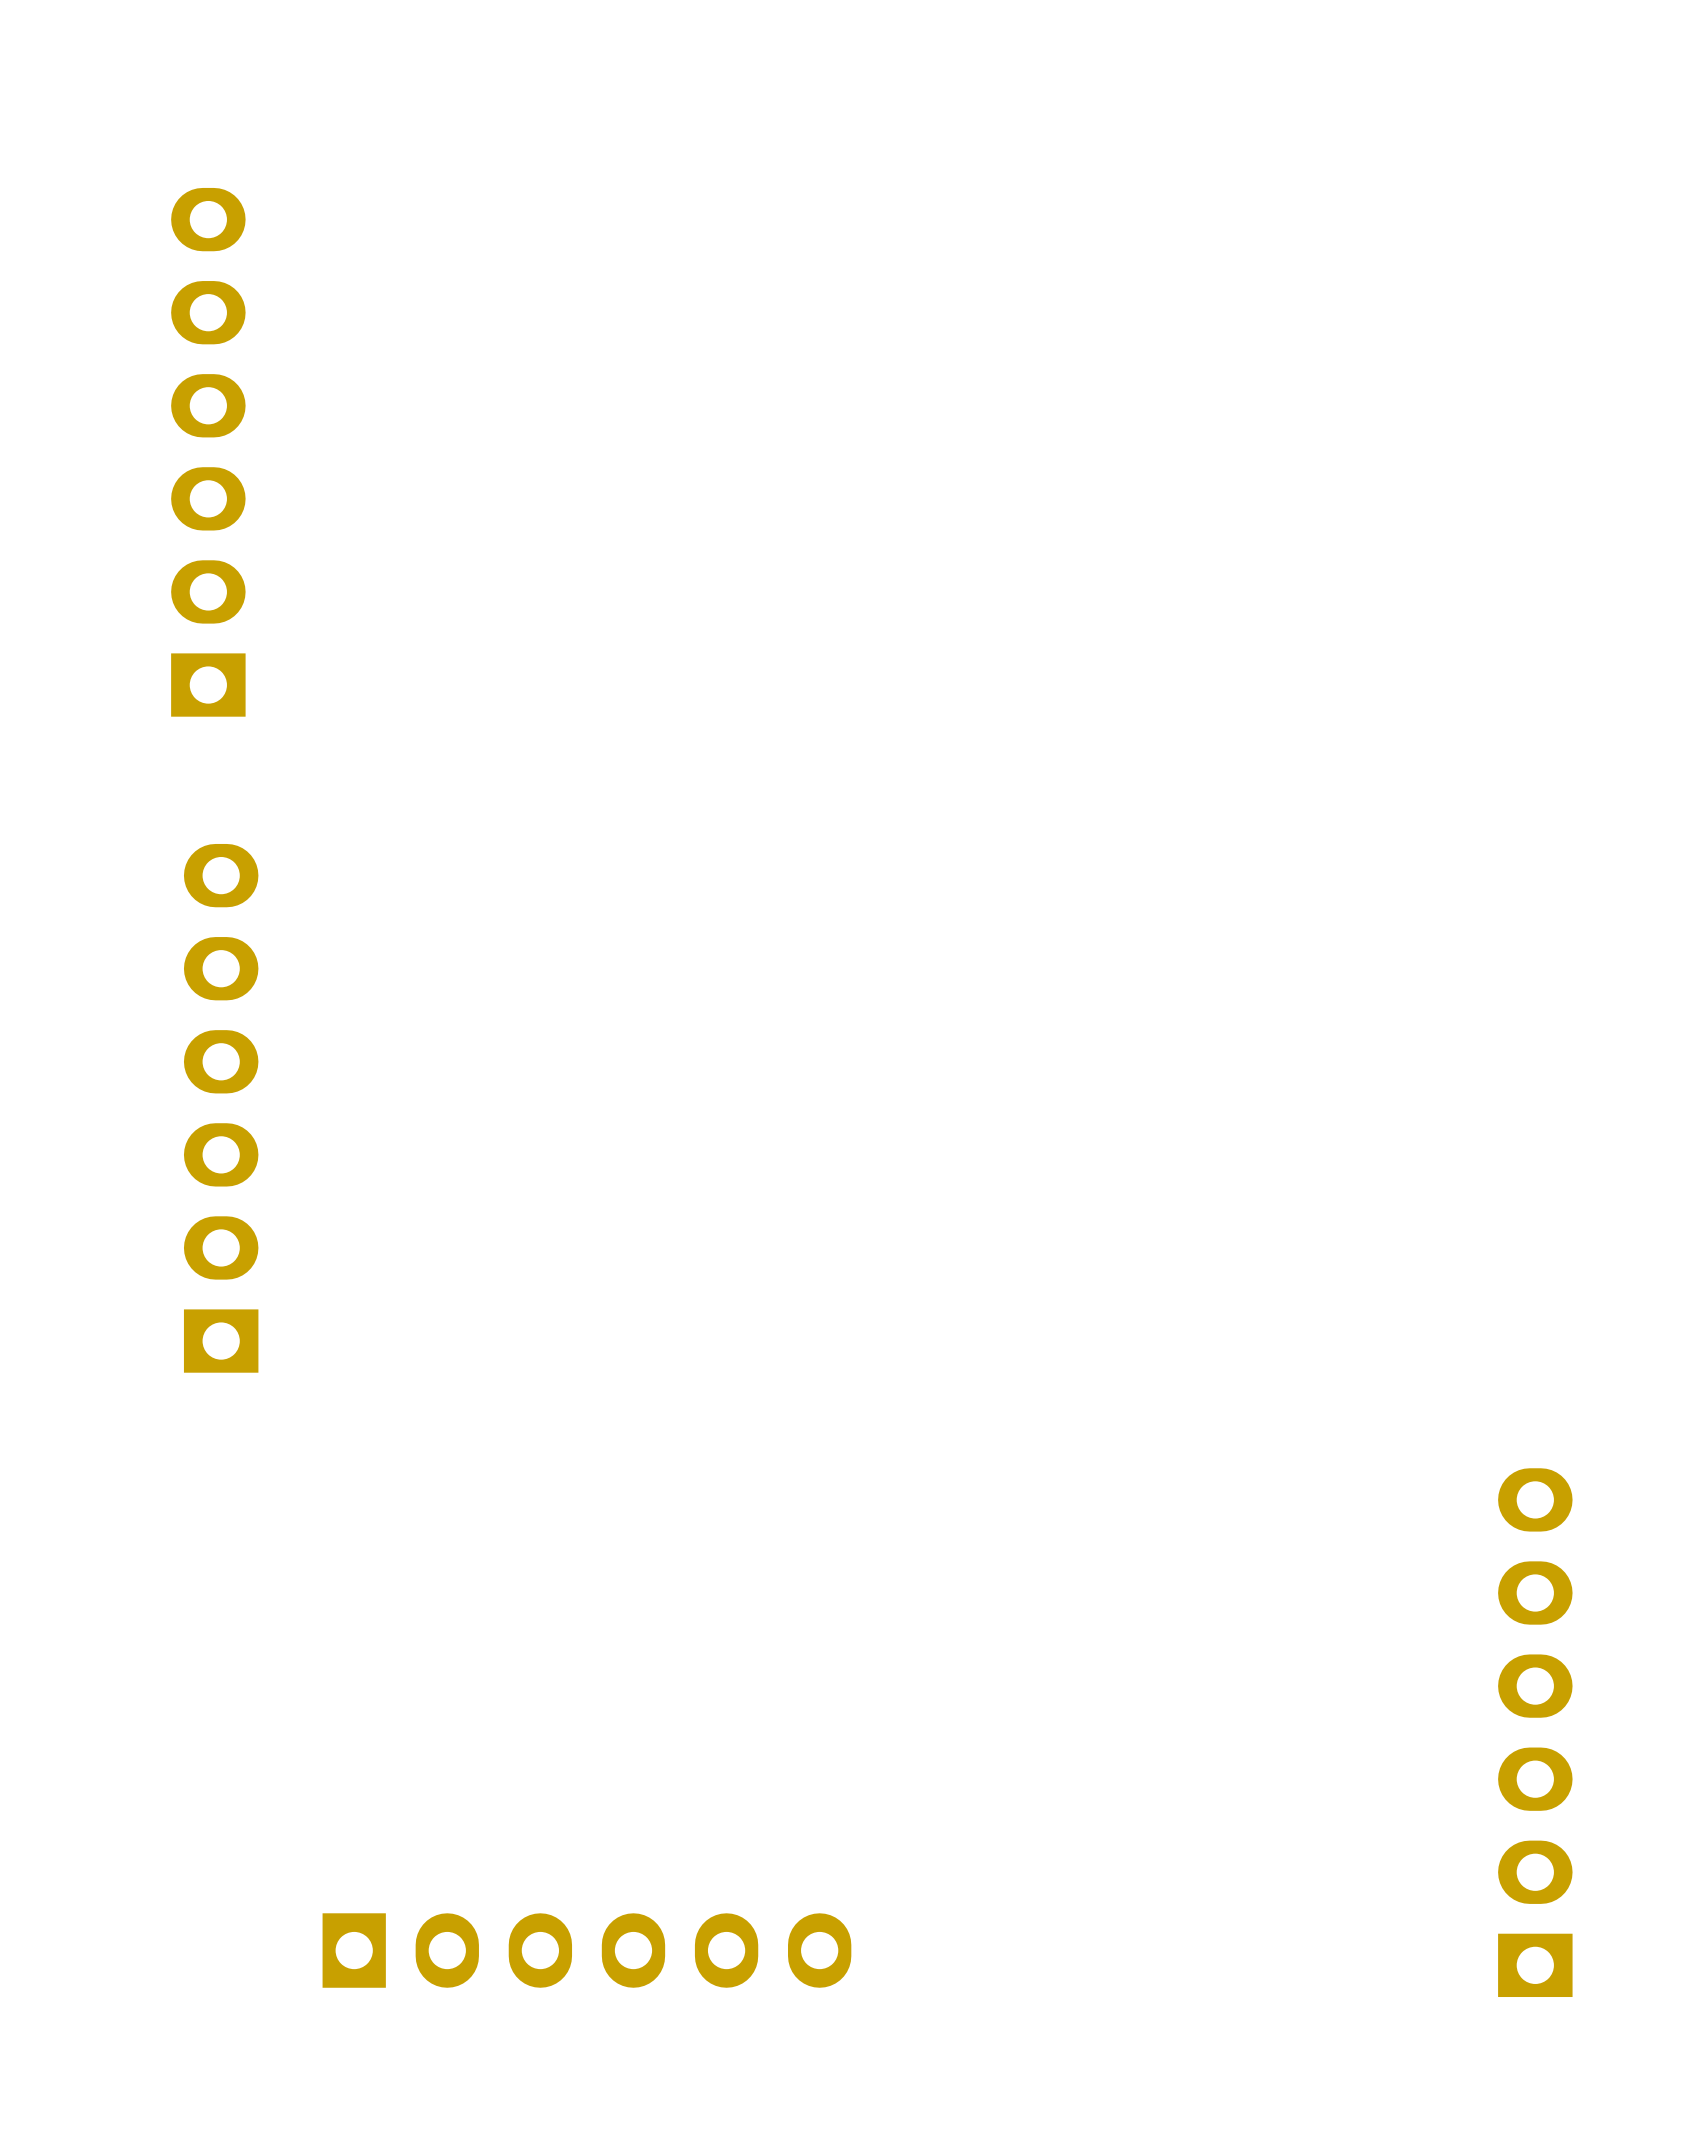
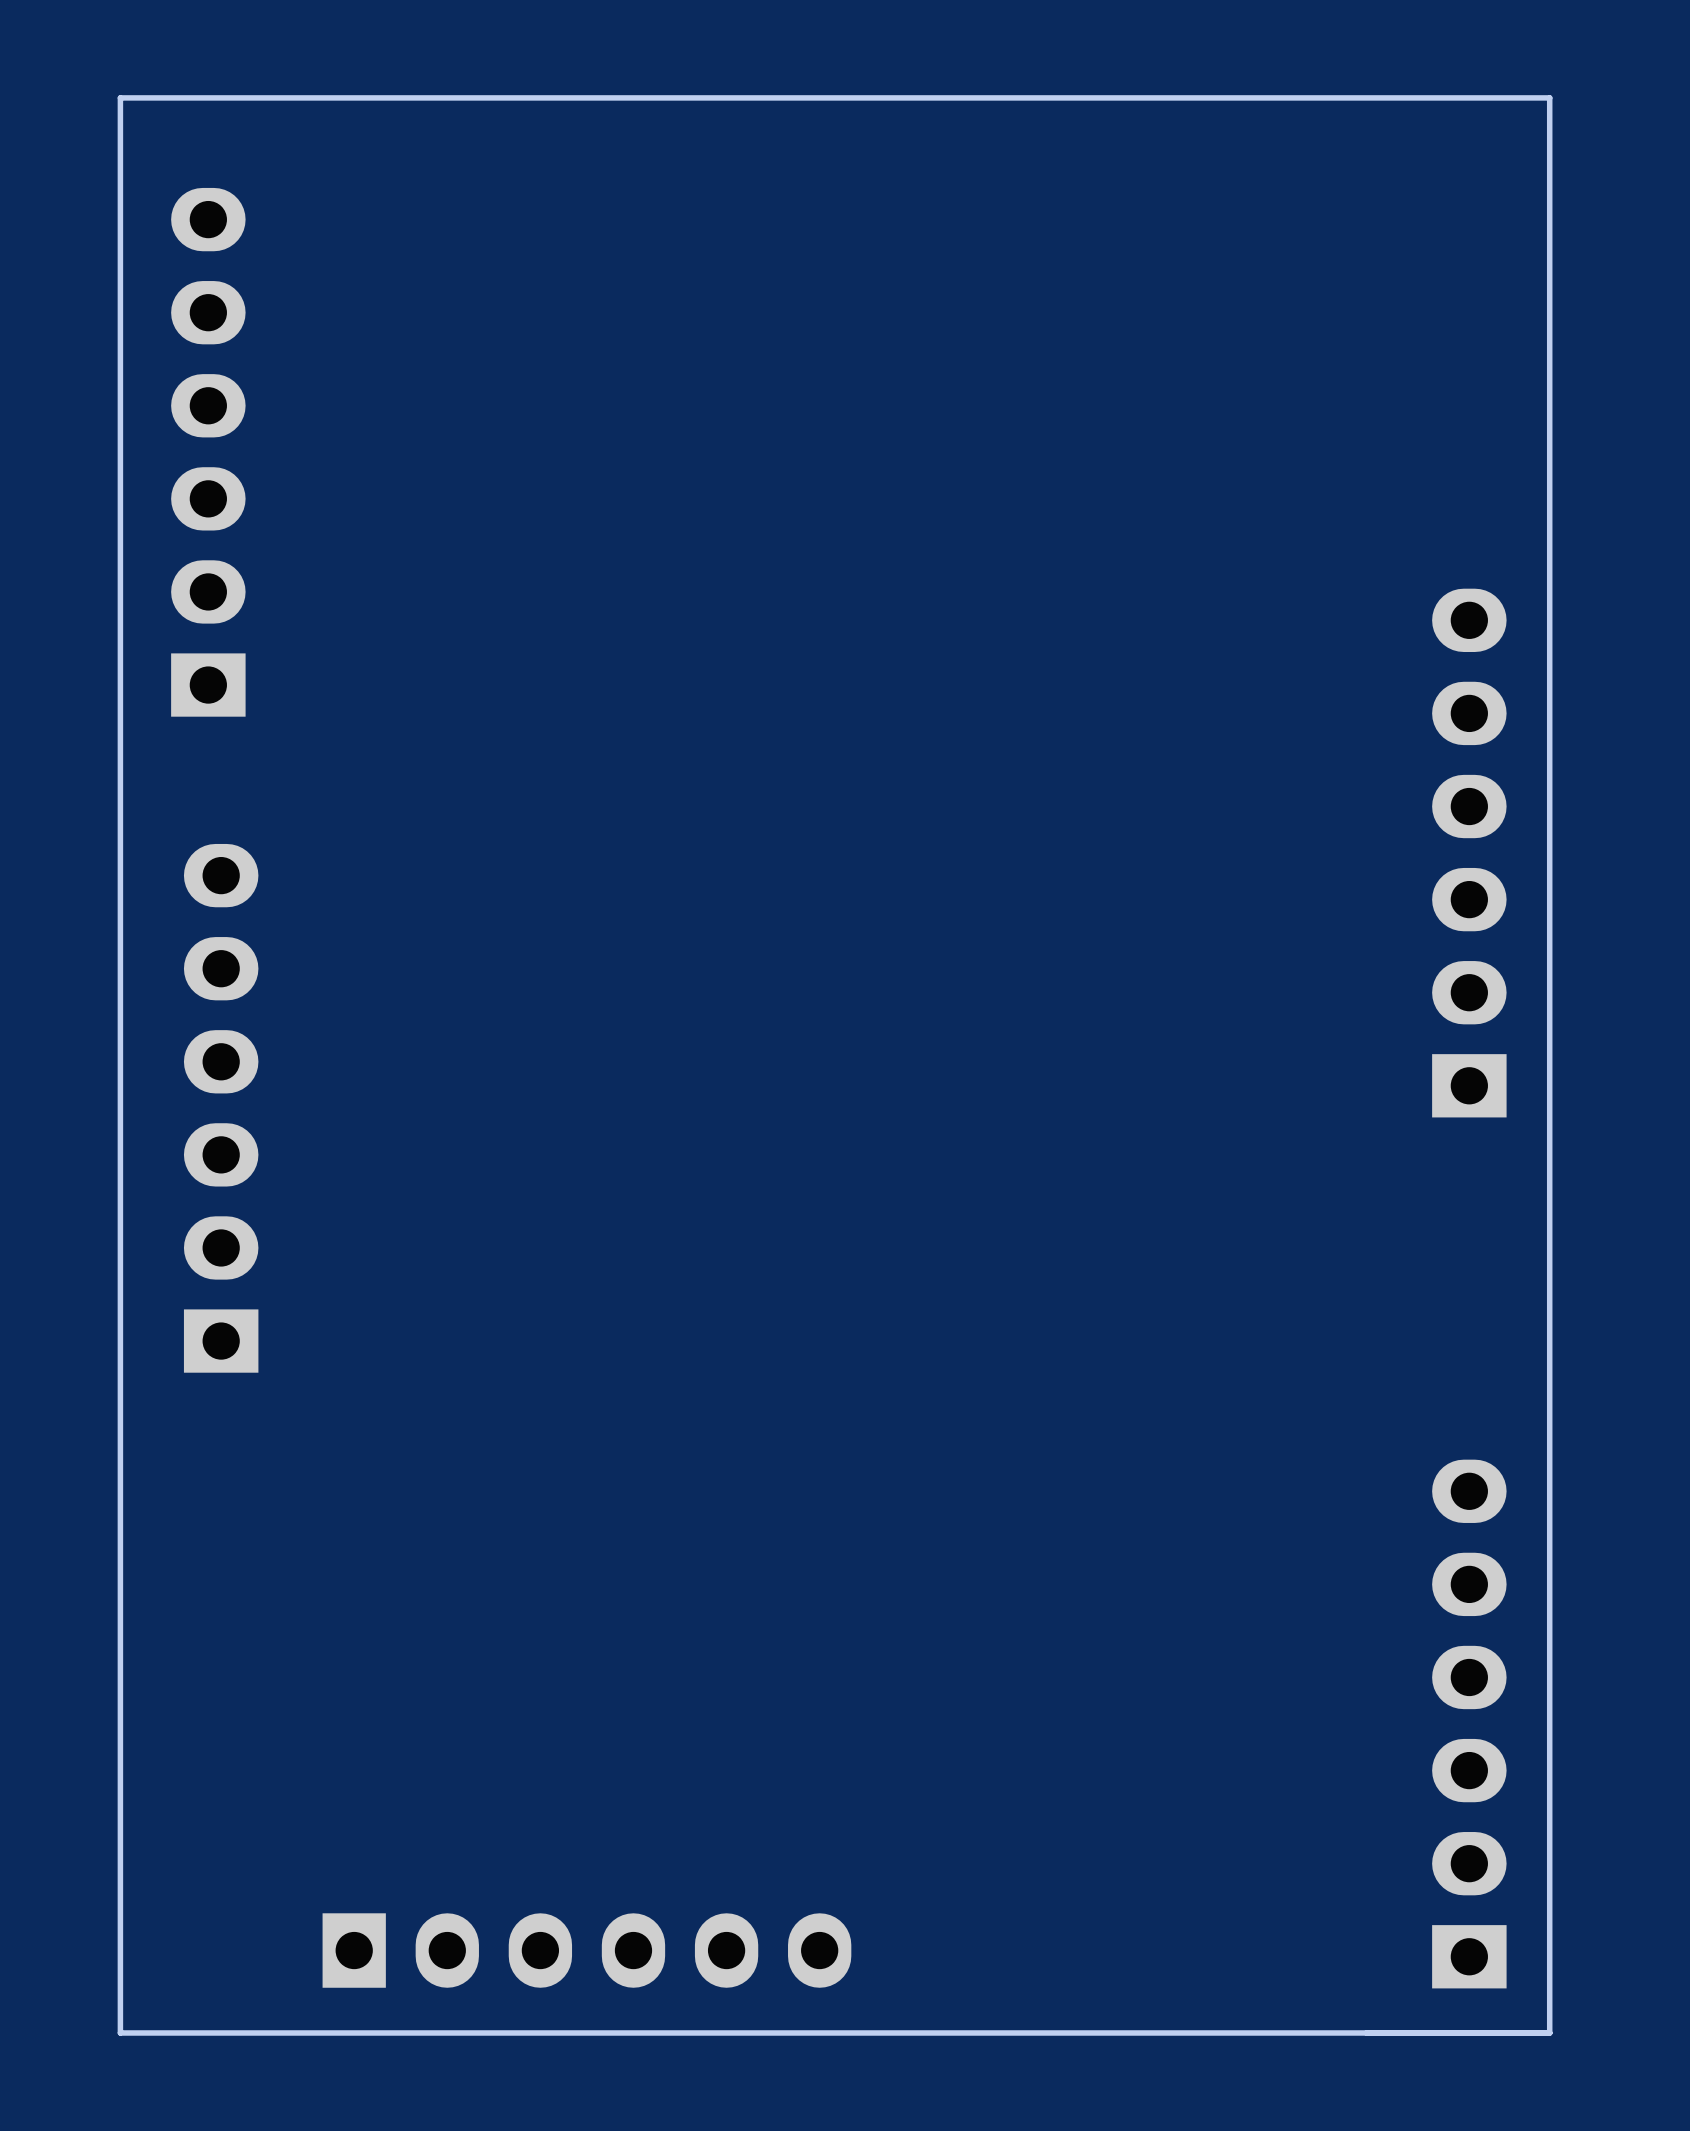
board edge: none -> (1549, 97) (120, 97) (120, 2032) (1549, 2032) (1549, 97)
part: none -> (1469, 853)
part position: (1535, 1732) -> (1469, 1724)

